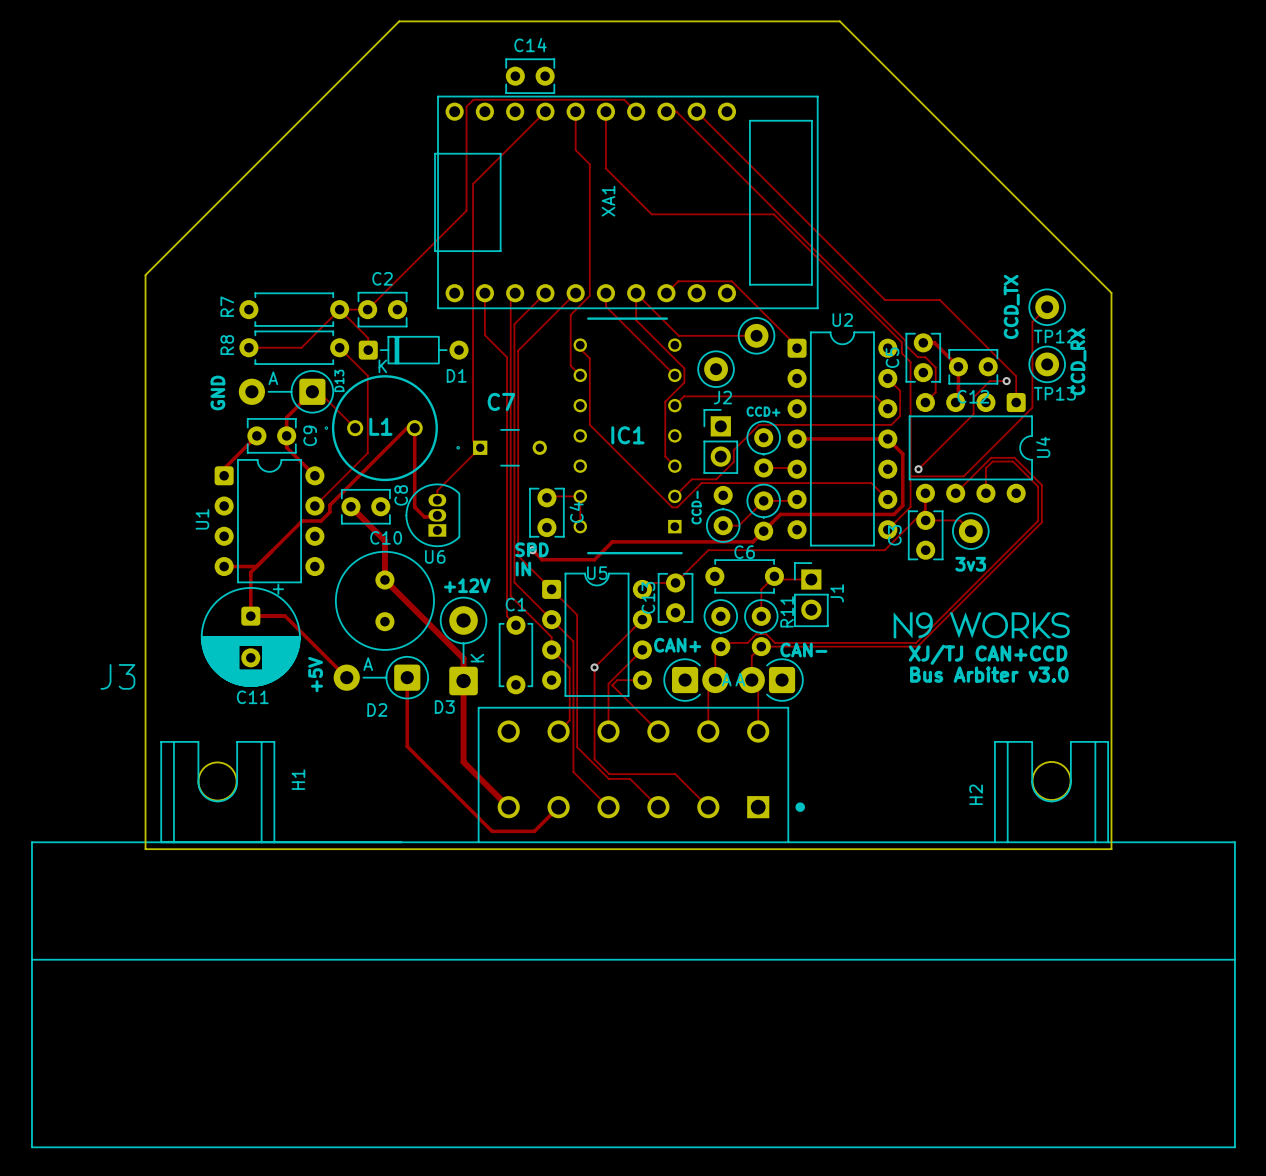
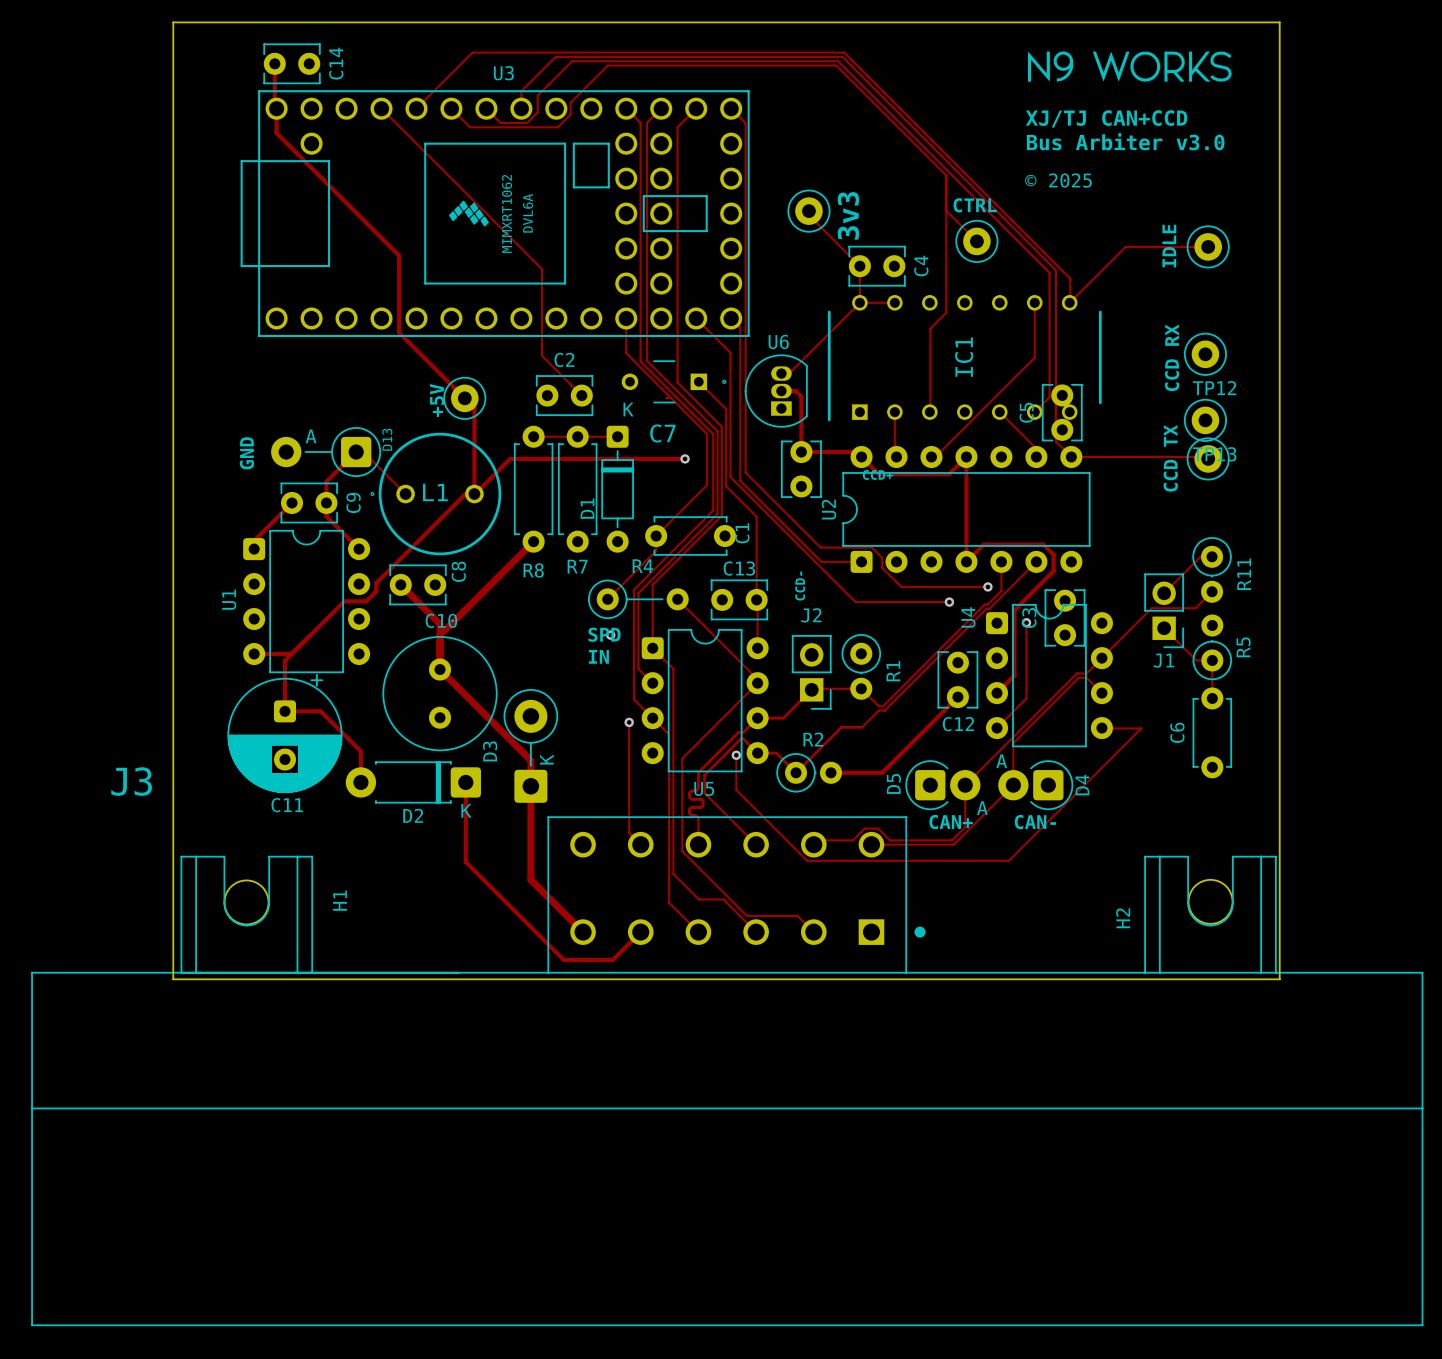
board edge: (399, 21) (839, 21) (1111, 292) (1111, 849) (145, 849) (145, 275) (399, 21) -> (173, 22) (173, 979) (1279, 979) (1279, 22) (173, 22)
C14 name rotation: 0° (530, 45) -> 90° counterclockwise (336, 63)
C14 name position: C14 (530, 45) -> C14 (336, 63)
drawing: none -> [1028, 51, 1232, 82]
track: none -> (274, 63) (274, 104)
C14 position: (530, 76) -> (292, 63)
track: none -> (381, 108) (542, 269) (542, 355) (581, 395)
track: none -> (416, 108) (472, 52) (844, 52) (1070, 278) (1070, 306)
track: none -> (451, 108) (470, 127) (557, 127) (570, 114) (570, 102) (607, 65) (836, 65) (946, 175) (946, 312) (930, 328) (930, 411)
track: none -> (486, 108) (500, 122) (527, 122) (537, 112) (537, 95) (572, 61) (838, 61) (1049, 272) (1049, 397) (1035, 411)
track: none -> (521, 108) (521, 91) (555, 56) (842, 56) (1055, 270) (1055, 441) (1071, 456) (1206, 456) (1208, 458)
track: none -> (661, 108) (646, 122) (646, 360) (717, 431) (717, 513) (638, 593) (638, 668) (652, 683)
track: none -> (731, 108) (745, 123) (745, 472) (820, 547) (872, 547) (882, 557) (882, 567) (901, 586) (987, 586)
text: none -> XJ/TJ CAN+CCD (1106, 118)
track: (545, 111) (473, 184) (473, 440) (480, 447) (437, 490) (437, 500) -> none
track: (575, 111) (575, 150) (589, 164) (589, 295) (570, 314) (570, 365) (580, 375) -> none
track: (605, 111) (605, 168) (651, 214) (773, 214) (901, 342) (901, 353) (910, 362) (910, 506) (887, 529) -> none
track: (636, 111) (624, 99) (473, 99) (466, 106) (466, 210) (367, 309) (339, 309) -> none
track: (666, 111) (676, 111) (905, 340) (905, 345) (917, 357) (925, 357) (935, 367) (935, 392) (925, 402) -> none
track: (696, 111) (885, 300) (939, 300) (1016, 376) (1016, 402) -> none
text: none -> Bus Arbiter v3.0 (1125, 141)
text: none -> © 2025 (1058, 180)
text: none -> CTRL (975, 205)
part: none -> (808, 211)
text: none -> 3v3 (848, 215)
track: none -> (946, 210) (976, 241)
U3: none -> (495, 213)
track: none -> (808, 215) (859, 266) (859, 306)
XA1: (626, 202) -> none
part: none -> (976, 241)
text: none -> IDLE (1169, 246)
track: none -> (1208, 246) (1125, 246) (1069, 302)
part: none -> (1208, 246)
track: none -> (894, 302) (859, 302) (789, 373)
track: none -> (1034, 302) (1034, 357) (935, 456)
track: none -> (626, 318) (626, 353) (707, 434) (707, 485) (656, 536) (656, 550) (607, 599)
track: none -> (696, 318) (730, 352) (730, 477) (855, 602) (949, 602)
track: none -> (731, 318) (740, 327) (740, 480) (821, 561) (861, 561)
track: (484, 293) (484, 335) (506, 357) (506, 616) (515, 625) -> none
track: (515, 293) (510, 297) (510, 596) (551, 637) (551, 649) (569, 667) (569, 720) (558, 731) -> (629, 722) (629, 833) (640, 844)
track: (545, 293) (514, 324) (514, 582) (573, 641) (573, 772) (583, 781) -> (626, 108) (640, 122) (640, 361) (713, 434) (713, 510) (634, 589) (634, 699) (669, 734) (669, 902)
track: (575, 293) (518, 350) (518, 555) (577, 614) (577, 747) (586, 756) -> (696, 108) (677, 127) (677, 382) (721, 426) (721, 515) (652, 584) (652, 648) (673, 668) (673, 874)
track: (605, 293) (605, 306) (674, 375) -> none
track: (666, 293) (678, 281) (731, 281) (797, 348) -> none
R7 name position: R7 (227, 306) -> R7 (577, 566)
text: CCD_TX (1011, 306) -> CCD RX (1172, 357)
track: (1047, 307) (1032, 321) (1032, 407) (963, 476) (910, 476) -> none
R7 rotation: 0° (294, 309) -> 90° clockwise (577, 489)
R7 position: (294, 309) -> (577, 489)
track: (339, 309) (368, 338) (368, 340) -> none
track: (339, 309) (301, 347) (248, 347) -> none
C2 position: (382, 309) -> (564, 395)
track: none -> (698, 381) (726, 409) (726, 486) (756, 516) (756, 599)
track: (756, 335) (678, 335) (636, 293) (636, 320) (684, 368) (684, 382) (665, 401) (665, 456) (674, 466) -> none
part: (756, 335) -> none
D1 footprint: [358, 336, 469, 365] -> [601, 425, 634, 553]
track: none -> (781, 391) (795, 391) (801, 396) (801, 452) (856, 452)
text: none -> +5V (437, 400)
track: (923, 342) (934, 342) (958, 366) (958, 399) -> none
R8 name position: R8 (227, 345) -> R8 (533, 570)
part: none -> (464, 398)
R8 rotation: 0° (294, 347) -> 90° clockwise (533, 489)
R8 position: (294, 347) -> (533, 489)
track: (339, 347) (367, 375) (367, 453) (314, 506) -> none
track: (580, 348) (589, 358) (589, 424) (672, 507) (677, 507) (701, 483) (871, 483) (887, 499) -> none
track: none -> (894, 412) (894, 455)
track: none -> (999, 412) (1036, 448)
text: CCD_RX (1078, 361) -> none
C12 rotation: 0° (973, 366) -> 90° clockwise (957, 679)
C12 position: (973, 366) -> (957, 679)
part: (716, 369) -> none
D1 name position: D1 (456, 375) -> D1 (587, 508)
track: none -> (533, 436) (617, 436)
track: (887, 378) (900, 390) (900, 416) (891, 424) (759, 424) (733, 450) (733, 461) (716, 479) (691, 479) (674, 496) -> none
track: (1006, 381) (989, 381) (973, 397) (973, 414) (918, 469) -> none
via: (1006, 381) -> none
track: none -> (861, 456) (878, 474) (949, 474) (966, 456) (966, 561) (983, 544) (1043, 544) (1053, 554) (1053, 571) (1014, 610) (1014, 675) (997, 693)
track: none -> (685, 458) (510, 458) (475, 494)
via: none -> (685, 458)
text: none -> CCD TX (1170, 458)
part: none -> (1208, 458)
track: (674, 405) (684, 396) (875, 396) (887, 408) -> none
part: none -> (801, 469)
track: (414, 428) (414, 507) (424, 516) (436, 516) -> (474, 494) (474, 407) (399, 332) (399, 255) (276, 133) (276, 108)
IC1 rotation: 0° (628, 435) -> 90° clockwise (964, 358)
IC1 position: (628, 435) -> (964, 358)
track: (797, 438) (887, 438) (902, 453) (902, 505) (894, 514) (780, 514) (752, 541) (612, 541) (594, 559) (542, 559) (532, 550) -> none
U2 rotation: 0° (842, 438) -> 90° counterclockwise (966, 509)
J2 rotation: 0° (720, 441) -> 180° (811, 672)
J2 position: (720, 441) -> (811, 672)
C7 rotation: 0° (501, 447) -> 180° (674, 381)
C7 position: (501, 447) -> (674, 381)
U4 rotation: 0° (970, 447) -> 90° counterclockwise (1049, 675)
U4 position: (970, 447) -> (1049, 675)
U4 name position: U4 (1043, 447) -> U4 (968, 617)
part: (763, 449) -> none
track: (763, 467) (795, 467) -> none
track: none -> (533, 541) (440, 635)
via: (918, 469) -> none
track: none -> (1212, 556) (1200, 556) (1164, 593)
track: none -> (1001, 561) (1001, 590) (987, 604) (984, 604) (883, 706) (878, 706) (861, 688) (812, 688)
track: (955, 493) (991, 457) (1014, 457) (1041, 485) (1041, 522) (917, 646) (761, 646) (751, 656) (751, 680) -> none
track: (985, 493) (985, 468) (992, 461) (1013, 461) (1038, 486) (1038, 520) (916, 642) (775, 642) (766, 634) (756, 634) (747, 642) (724, 642) -> none
track: (546, 497) (580, 496) (580, 526) -> none
track: (795, 500) (763, 500) (738, 525) (723, 525) -> none
via: none -> (987, 586)
track: (925, 509) (884, 550) (708, 550) (675, 582) (648, 582) (642, 589) -> none
C4 rotation: 0° (546, 512) -> 90° clockwise (877, 266)
C4 position: (546, 512) -> (877, 266)
part: (763, 512) -> none
track: none -> (1212, 591) (1195, 608) (1151, 608) (1086, 673) (1076, 673) (965, 785) (965, 827) (952, 840) (889, 840) (878, 828) (864, 828) (853, 840) (818, 840)
part: (723, 514) -> none
U6 position: (432, 515) -> (776, 391)
R4: none -> (638, 599)
track: none -> (677, 599) (757, 679)
track: none -> (757, 600) (757, 648)
track: (925, 520) (960, 520) (970, 531) -> none
via: none -> (949, 602)
part: (970, 531) -> none
track: none -> (1026, 622) (1026, 698) (997, 728)
via: none -> (1026, 622)
track: none -> (1164, 628) (1196, 660) (1212, 660) (1212, 698)
C6 name position: C6 (744, 552) -> C6 (1177, 732)
U6 name position: U6 (435, 556) -> U6 (778, 341)
R5: none -> (1212, 647)
text: 3v3 (970, 564) -> none
U5 name position: U5 (597, 573) -> U5 (704, 788)
C6 rotation: 0° (744, 576) -> 90° clockwise (1212, 732)
C6 position: (744, 576) -> (1212, 732)
track: (774, 576) (761, 589) (761, 616) -> none
R1: none -> (861, 666)
track: (778, 579) (811, 579) -> none
text: +12V (467, 585) -> none
J1 name position: J1 (837, 593) -> J1 (1164, 660)
J1 rotation: 0° (811, 594) -> 180° (1164, 610)
J1 position: (811, 594) -> (1164, 610)
C13 rotation: 0° (675, 597) -> 90° clockwise (739, 599)
C13 position: (675, 597) -> (739, 599)
track: none -> (957, 697) (882, 772) (830, 772)
R11 name position: R11 (787, 611) -> R11 (1244, 574)
drawing: [893, 612, 1070, 639] -> none
track: (281, 616) (285, 616) (346, 677) -> (320, 711) (360, 751) (360, 782)
track: (642, 619) (594, 667) -> (757, 683) (682, 758) (682, 770)
via: none -> (629, 722)
R11 position: (720, 627) -> (1212, 569)
part: (761, 627) -> none
track: none -> (1102, 728) (1141, 728) (1009, 860) (807, 860) (736, 789) (736, 755)
U5 position: (597, 634) -> (705, 700)
text position: CAN+ (677, 645) -> CAN+ (951, 822)
track: (642, 649) (608, 683) (608, 709) -> (811, 689) (783, 718) (757, 718) (743, 732) (738, 732) (698, 772) (698, 789) (690, 791) (689, 794) (691, 798) (702, 800) (702, 806) (691, 807) (689, 810) (690, 814) (696, 816) (698, 819)
text position: CAN- (803, 650) -> CAN- (1035, 822)
track: (715, 652) (715, 680) -> none
via: none -> (736, 755)
text: XJ/TJ CAN+CCD (988, 654) -> none
C1 rotation: 0° (515, 655) -> 90° clockwise (690, 536)
C1 position: (515, 655) -> (690, 536)
D2 footprint: [333, 656, 429, 700] -> [345, 761, 481, 804]
via: (594, 667) -> none
R2: none -> (809, 772)
text: +5V (315, 674) -> none
text: Bus Arbiter v3.0 (989, 674) -> none
track: (642, 680) (617, 680) (612, 685) (613, 686) -> (1036, 561) (884, 710) (878, 710) (862, 727) (841, 727) (796, 772) (776, 753) (757, 753) (741, 738) (704, 775) (704, 793)
part: (695, 680) -> none
part: (771, 680) -> none
D5: none -> (942, 785)
D4: none -> (1035, 785)
track: (758, 686) (758, 731) -> (1101, 693) (1086, 677) (1078, 677) (1013, 743) (1013, 785) (953, 844) (871, 844)
track: (708, 687) (708, 731) -> none
D3 name rotation: 0° (444, 706) -> 90° counterclockwise (490, 751)
D3 name position: D3 (444, 706) -> D3 (490, 751)
track: (594, 737) (594, 759) (609, 774) (675, 774) (694, 793) -> (682, 851) (747, 916) (797, 916)

